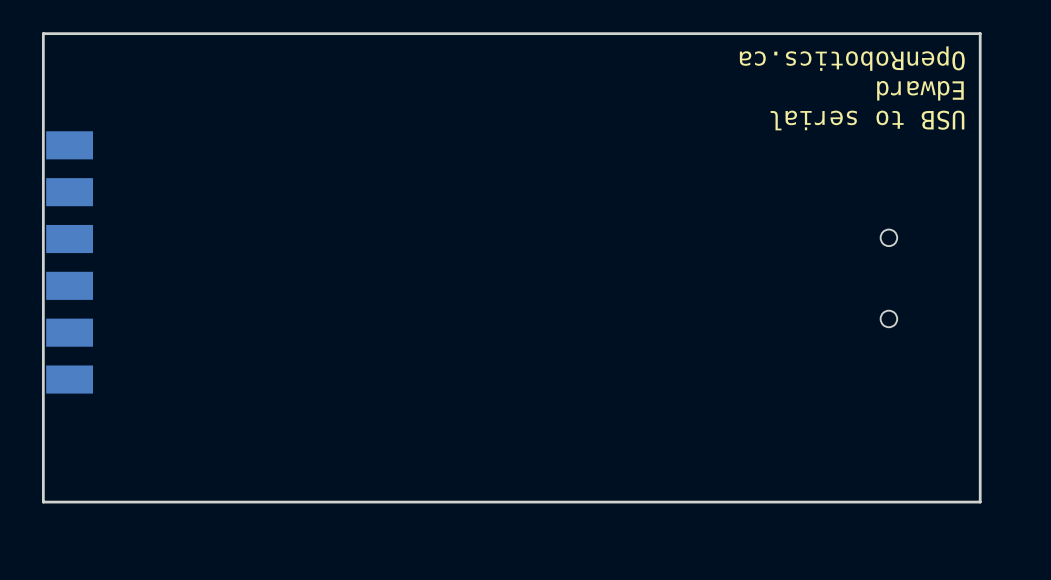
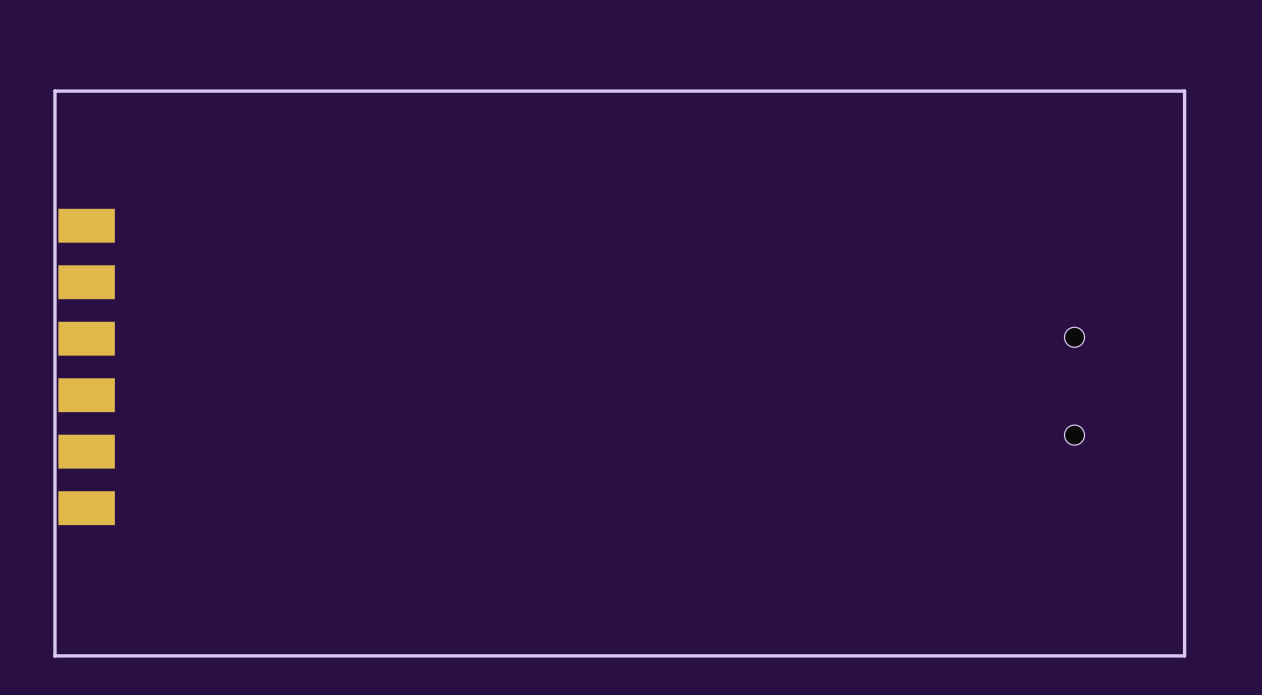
text: OpenRobotics.ca (852, 58) -> none
text: Edward (920, 90) -> none
text: USB to serial (867, 120) -> none

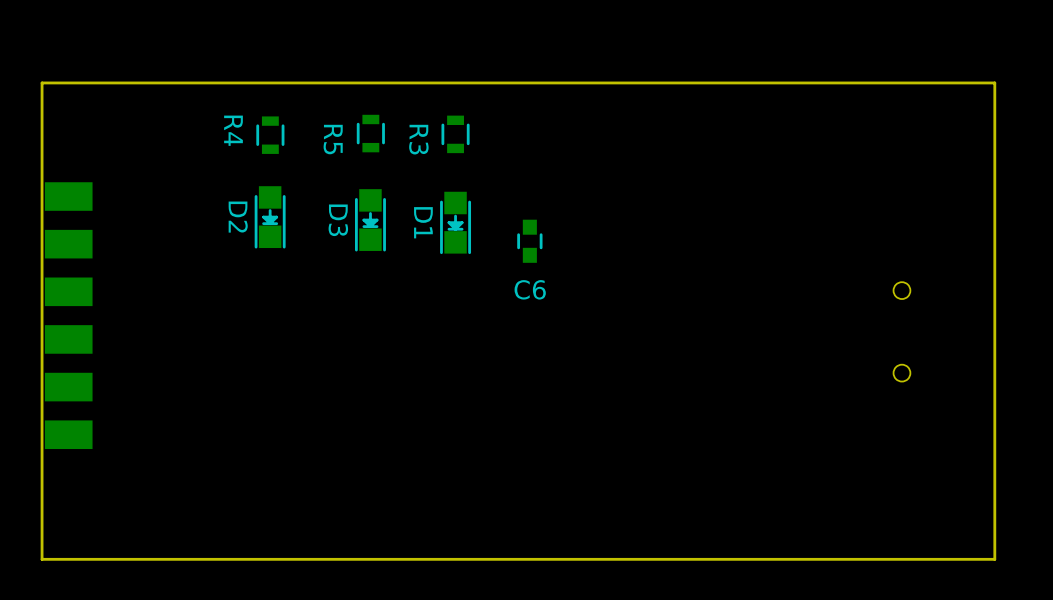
R5: none -> (370, 133)
R3: none -> (455, 134)
R4: none -> (270, 135)
D2: none -> (270, 217)
D3: none -> (370, 220)
D1: none -> (455, 222)
C6: none -> (529, 241)

